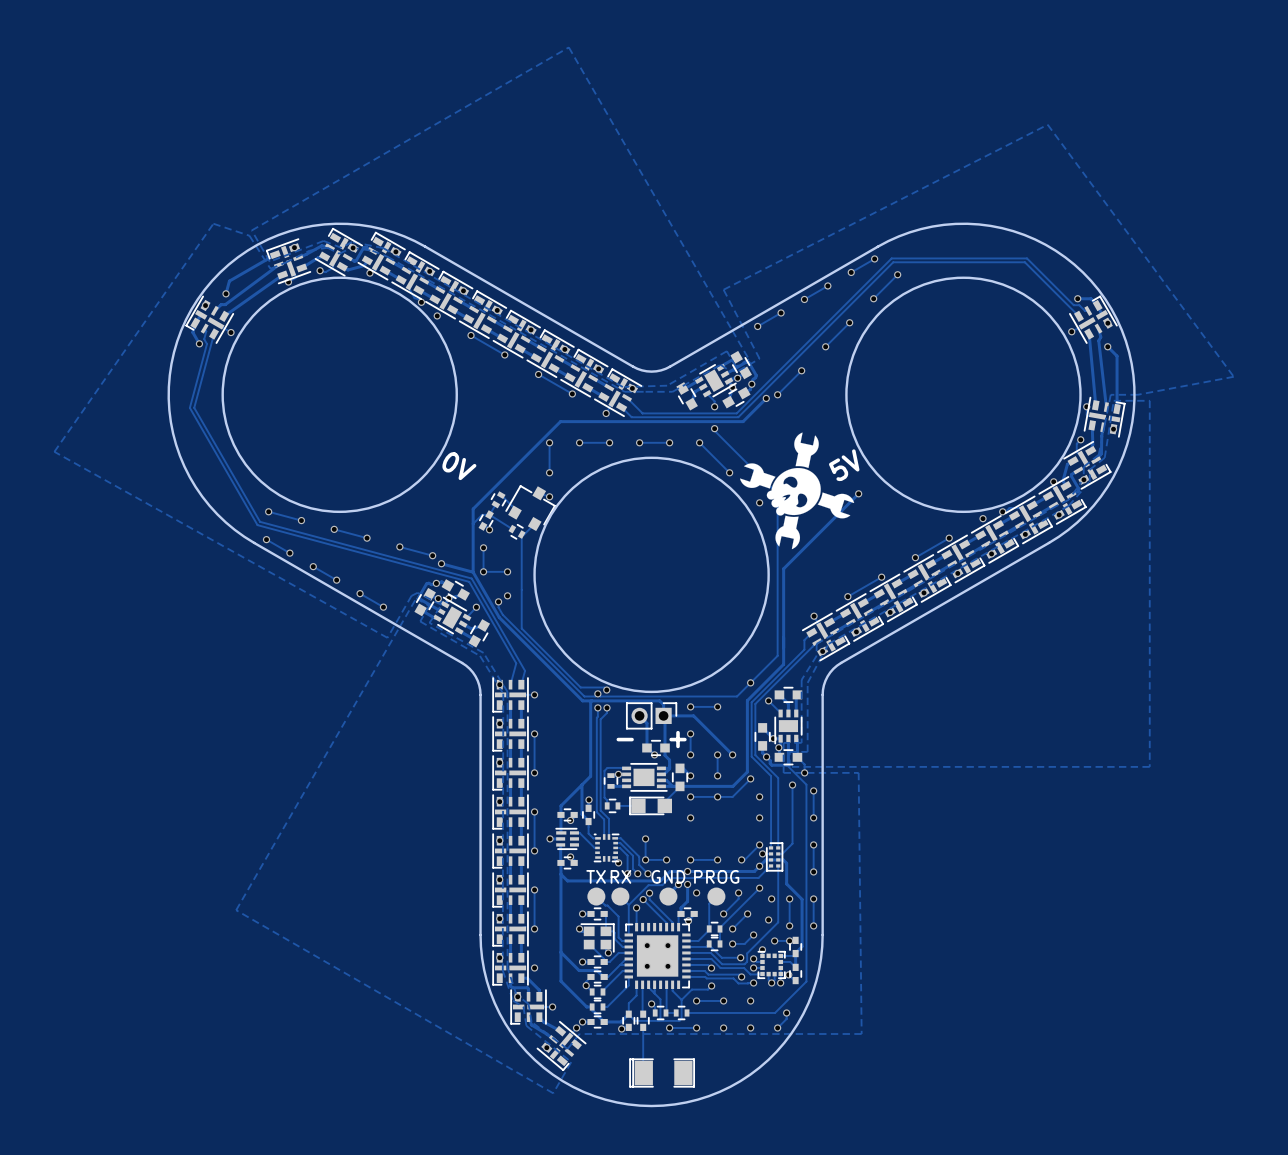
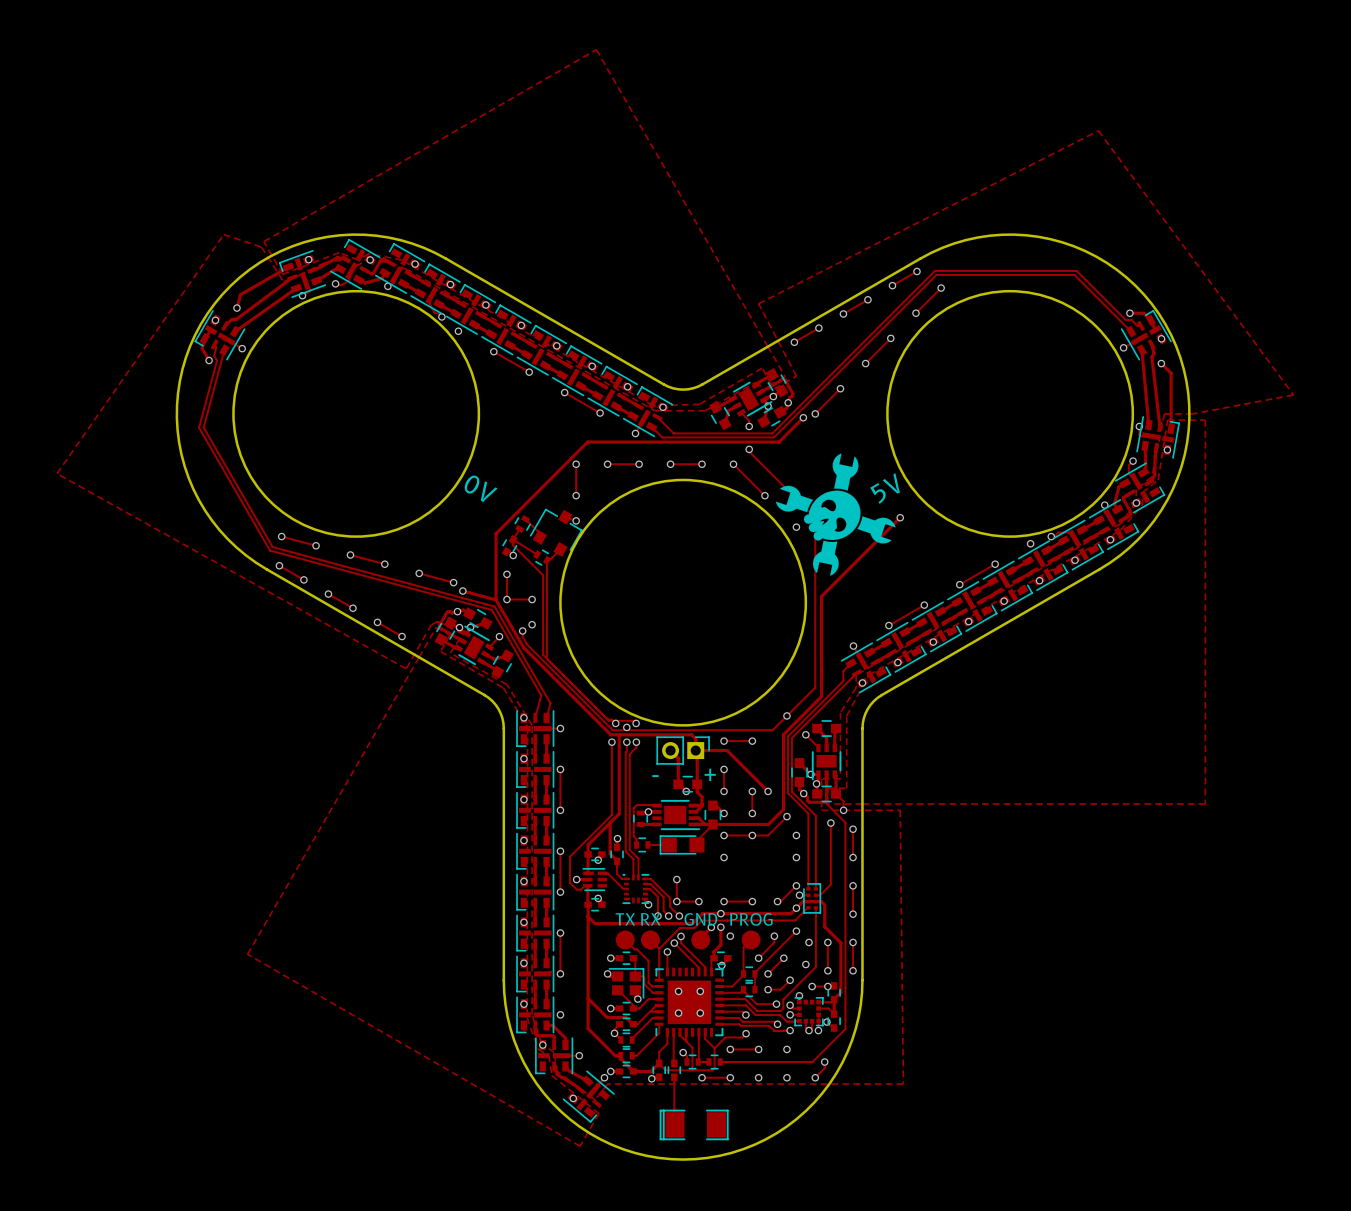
track: (489, 514) (482, 514) (473, 523) -> (513, 539) (513, 545) (543, 575) (543, 654) (607, 719) (611, 719) (615, 723)
via: none -> (615, 723)
track: none -> (611, 742) (611, 814) (570, 856) (570, 882) (576, 889) (581, 889) (584, 885)
via: none -> (611, 742)

